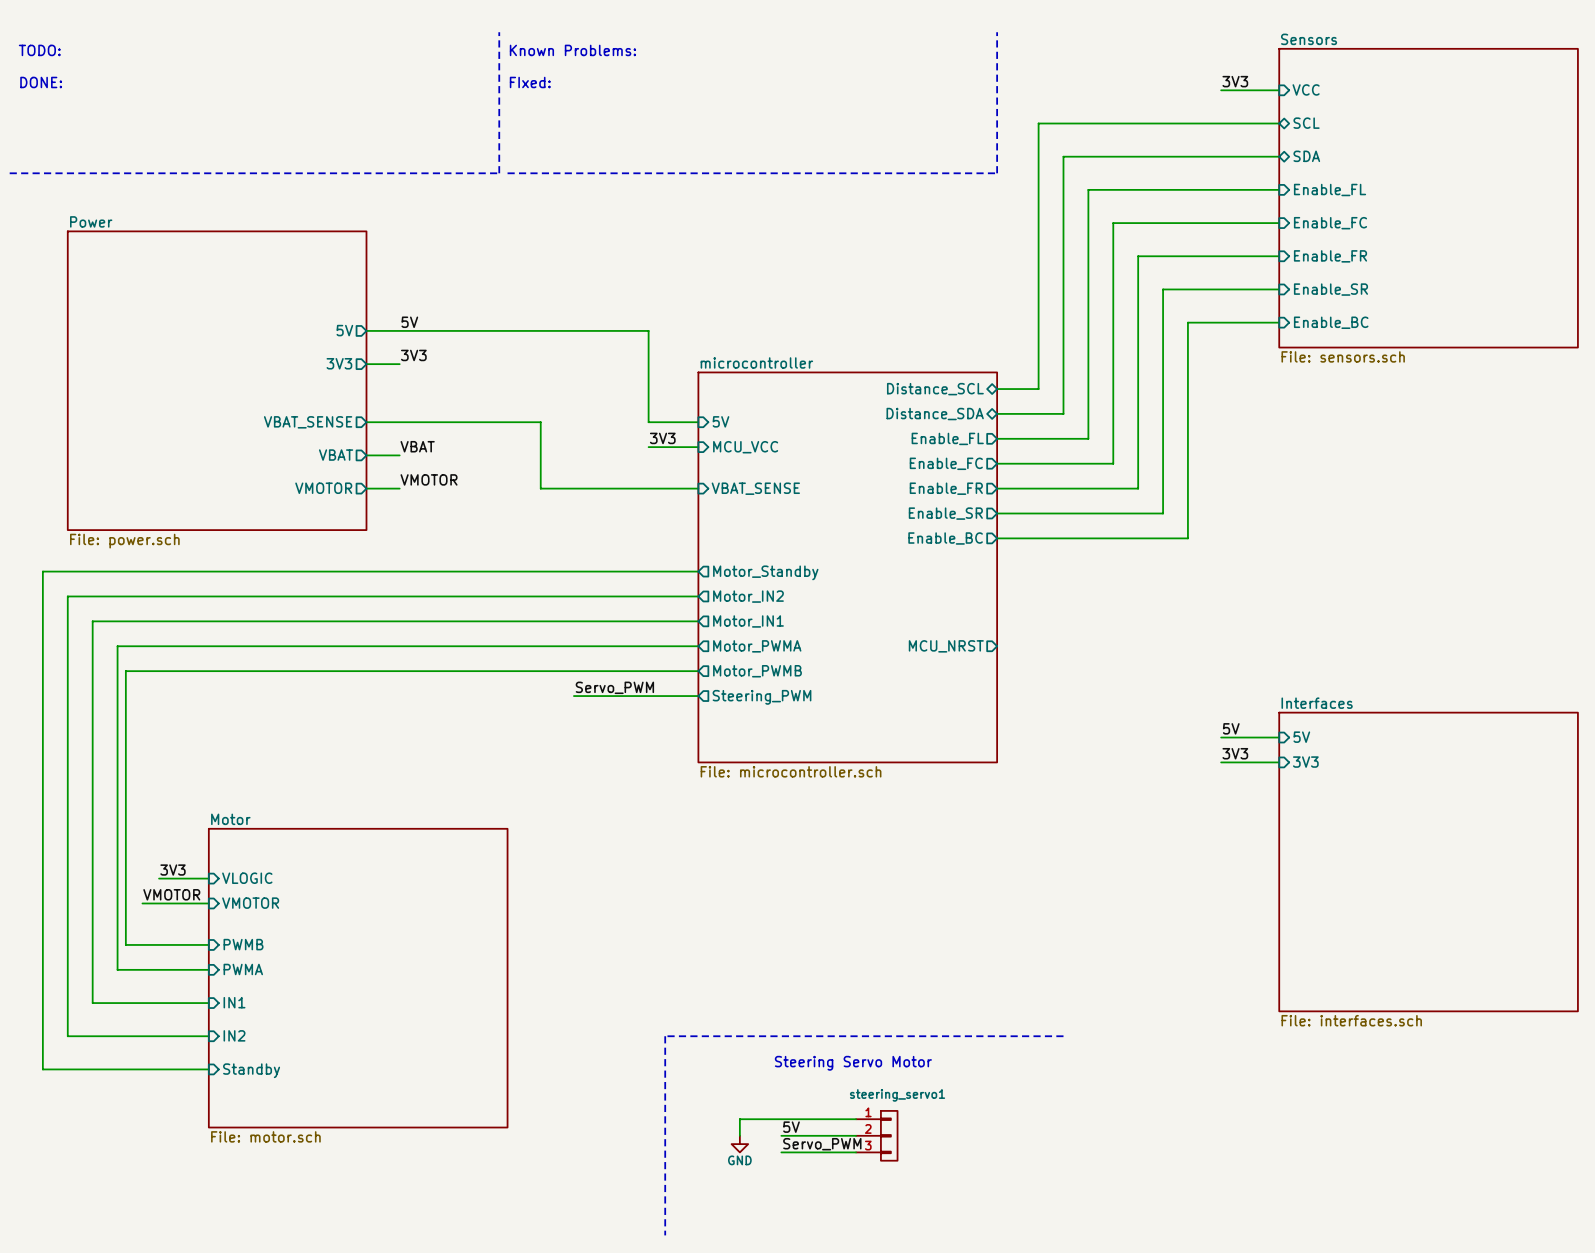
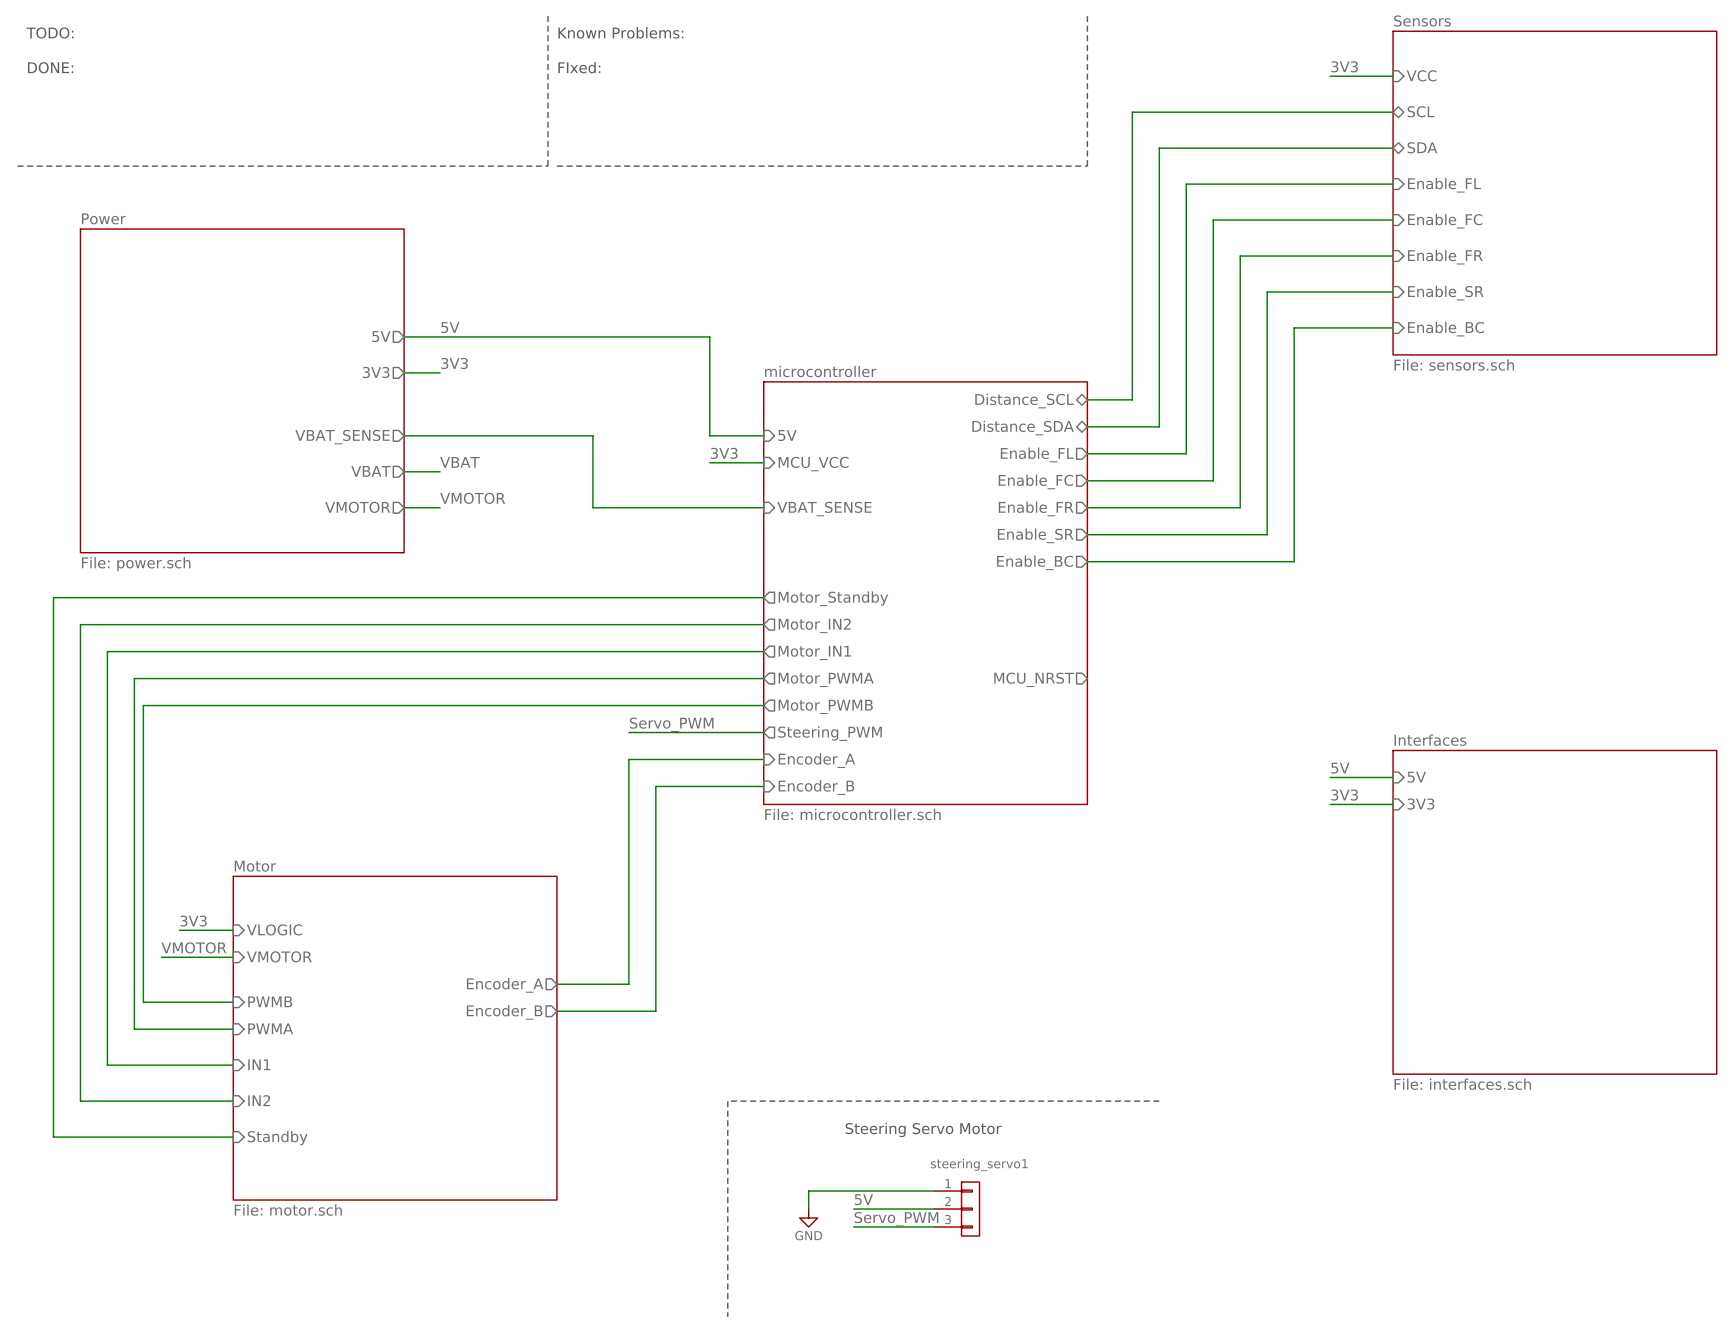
wire: none -> (763, 759) (628, 759) (628, 984) (556, 984)
sheet pin: none -> Encoder_A (816, 760)
wire: none -> (763, 786) (655, 786) (655, 1011) (556, 1011)
sheet pin: none -> Encoder_B (816, 787)
sheet pin: none -> Encoder_A (505, 985)
sheet pin: none -> Encoder_B (504, 1012)

